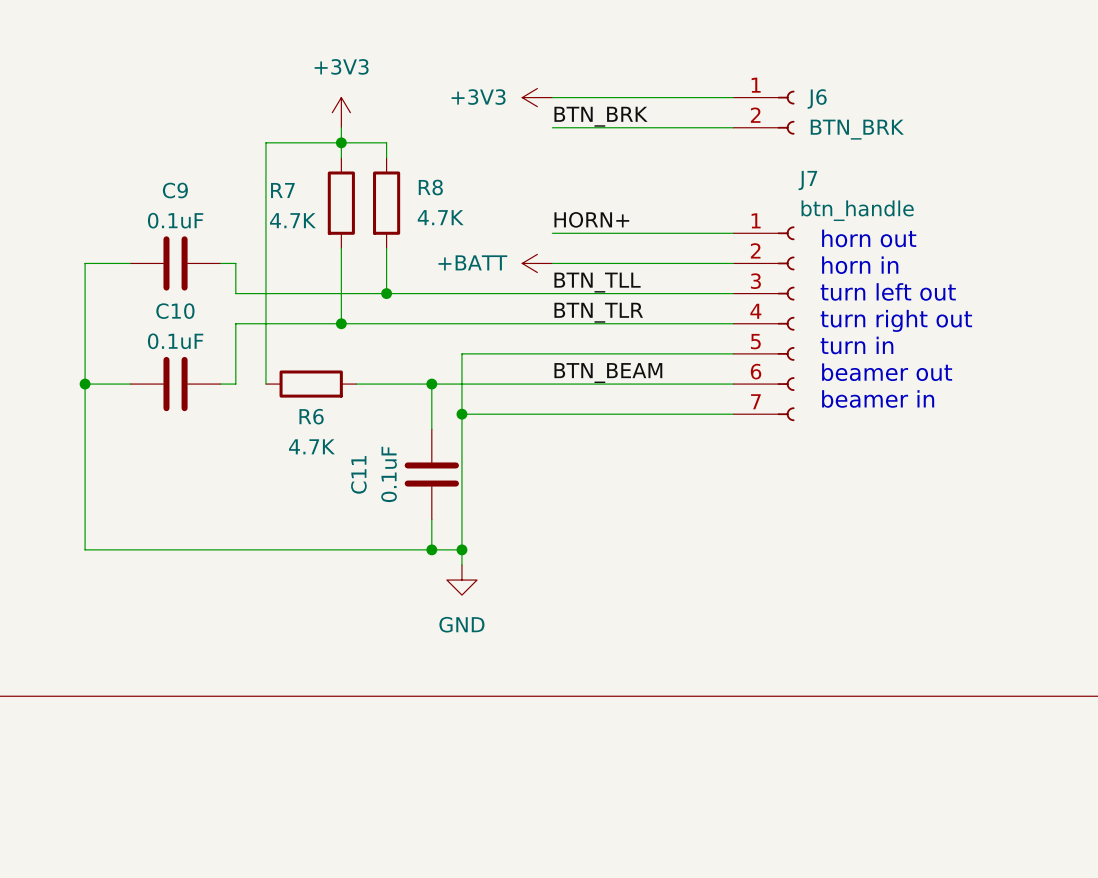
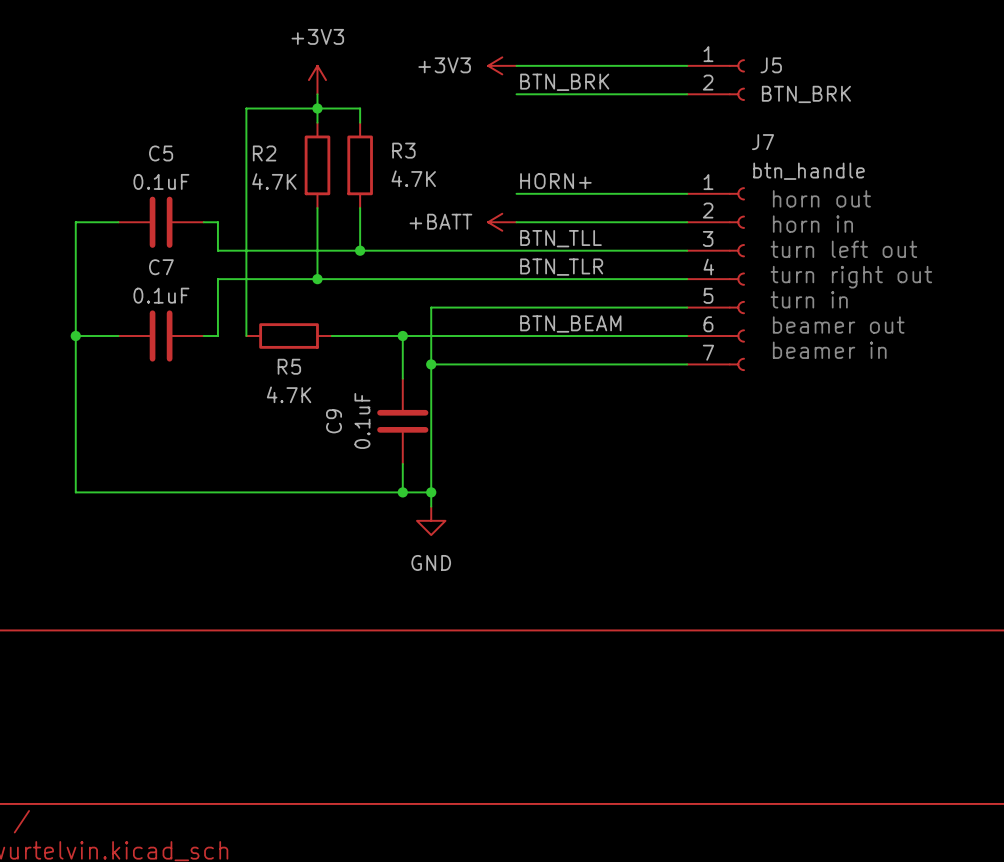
J6 name: J6 (817, 98) -> J5 (771, 65)
R8 name: R8 (430, 187) -> R3 (403, 150)
C9 name: C9 (175, 190) -> C5 (161, 153)
R7 name: R7 (282, 190) -> R2 (264, 153)
C10 name: C10 (175, 311) -> C7 (161, 267)
R6 name: R6 (311, 416) -> R5 (289, 366)
C11 name: C11 (358, 474) -> C9 (334, 421)

